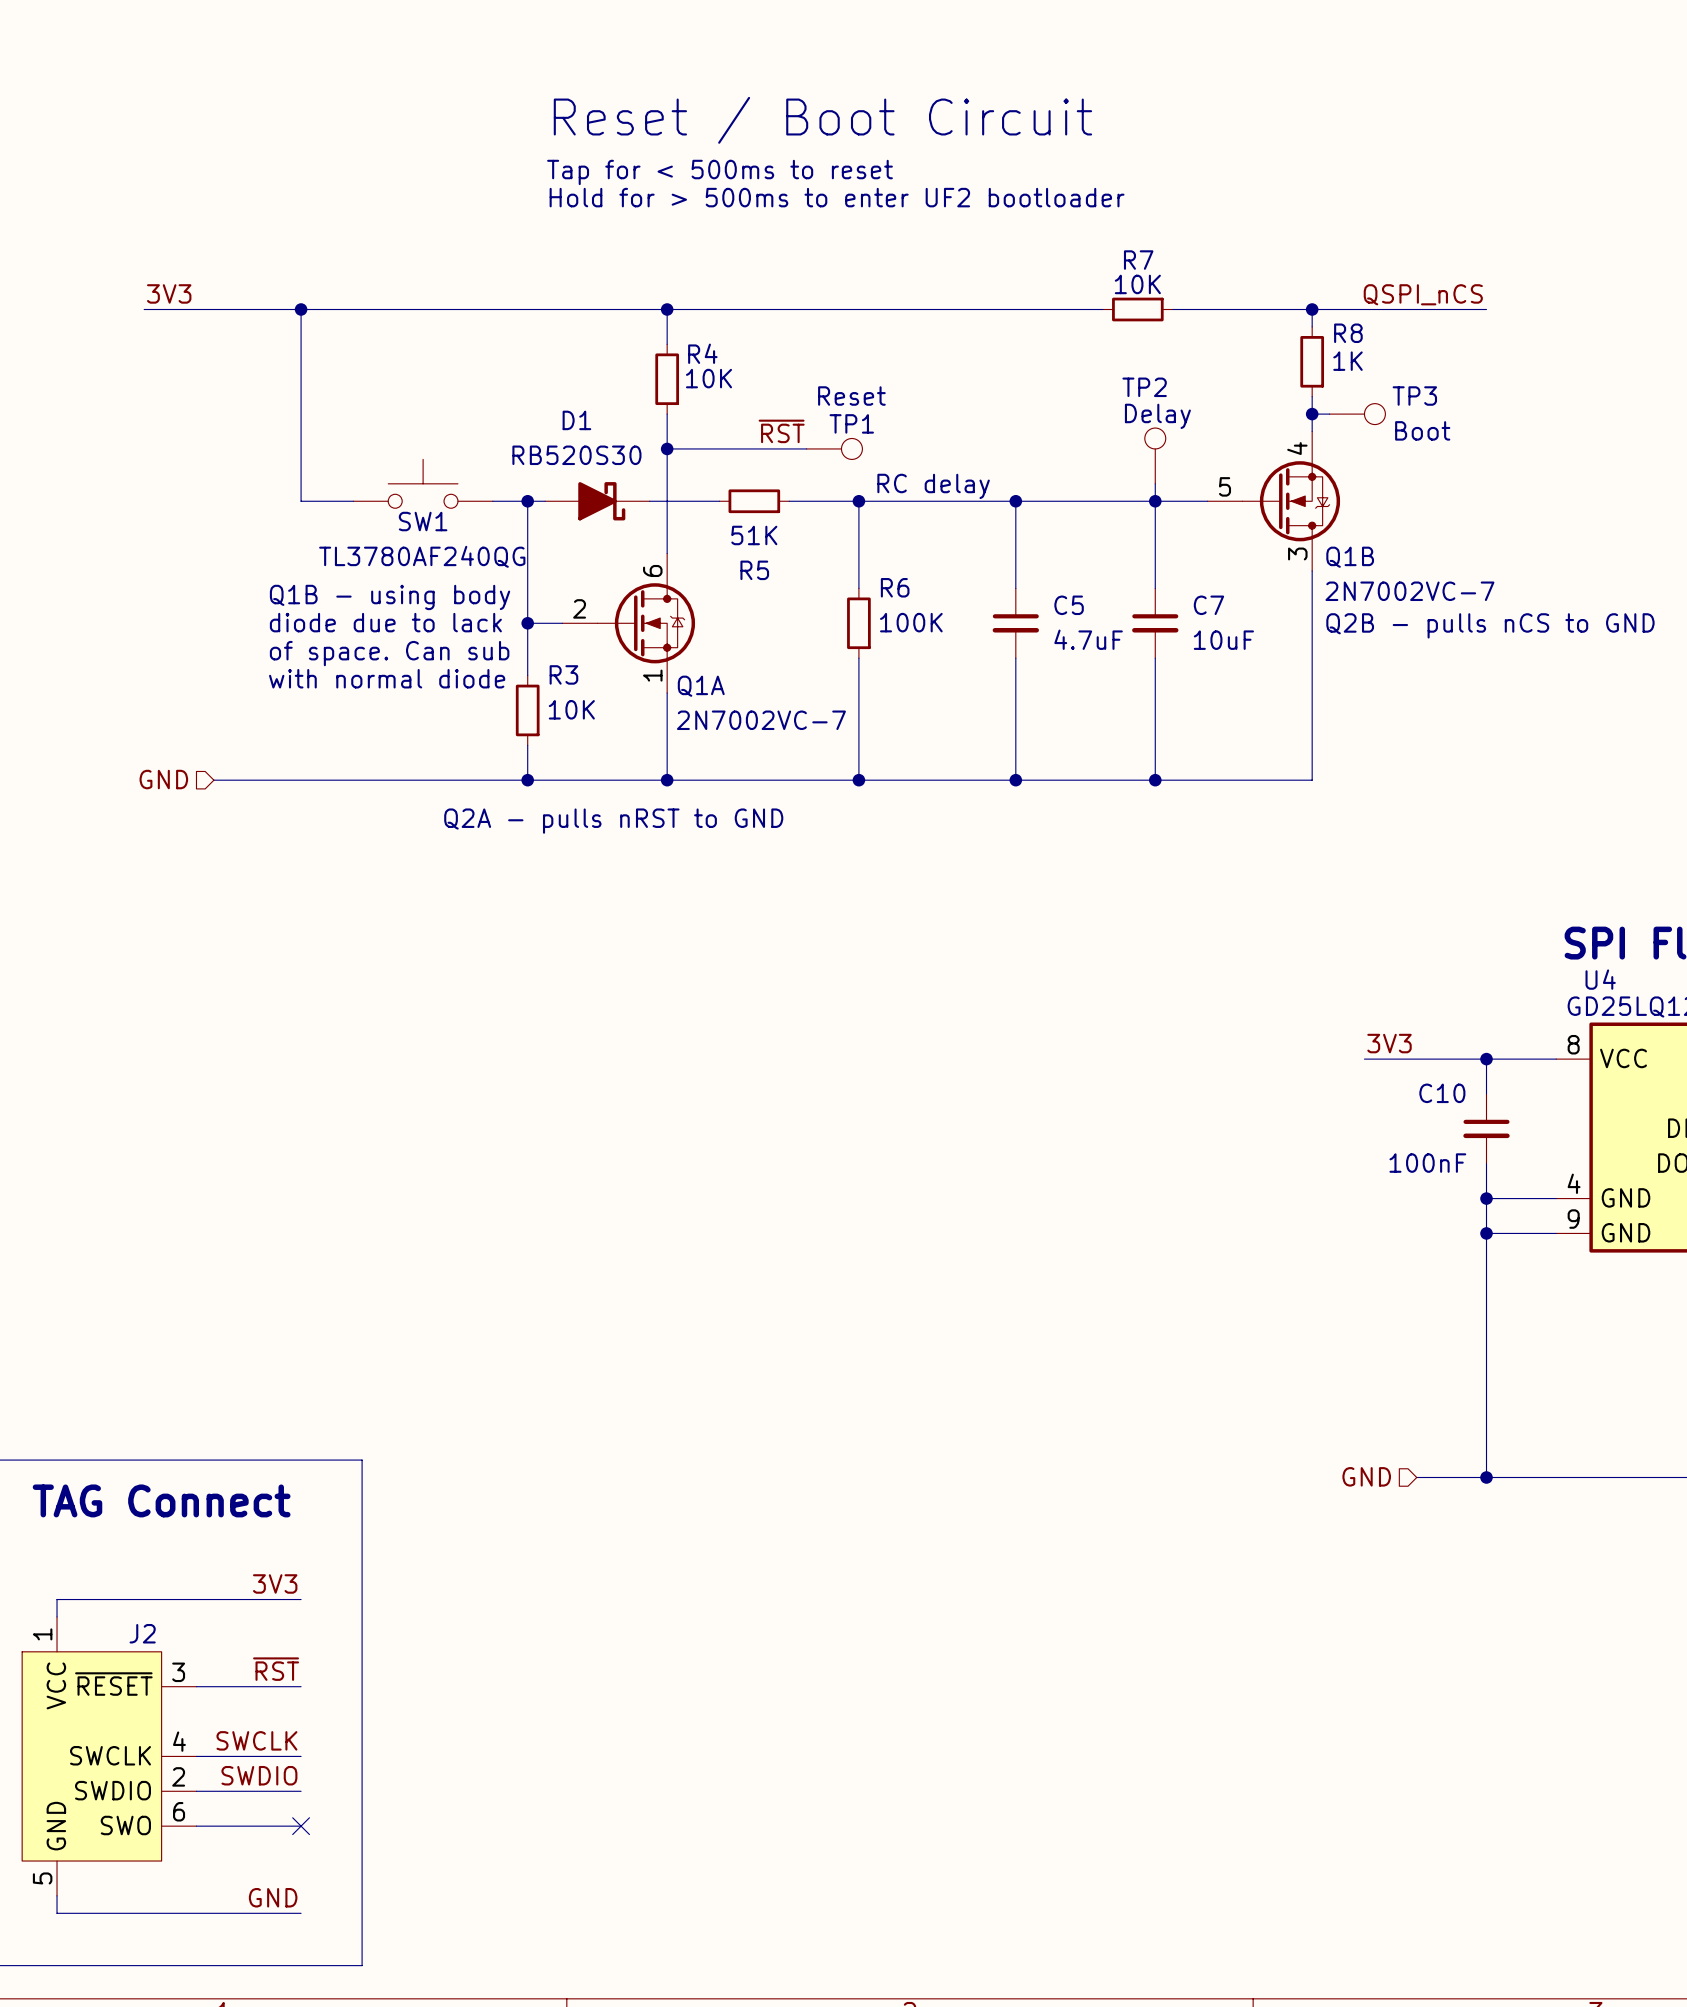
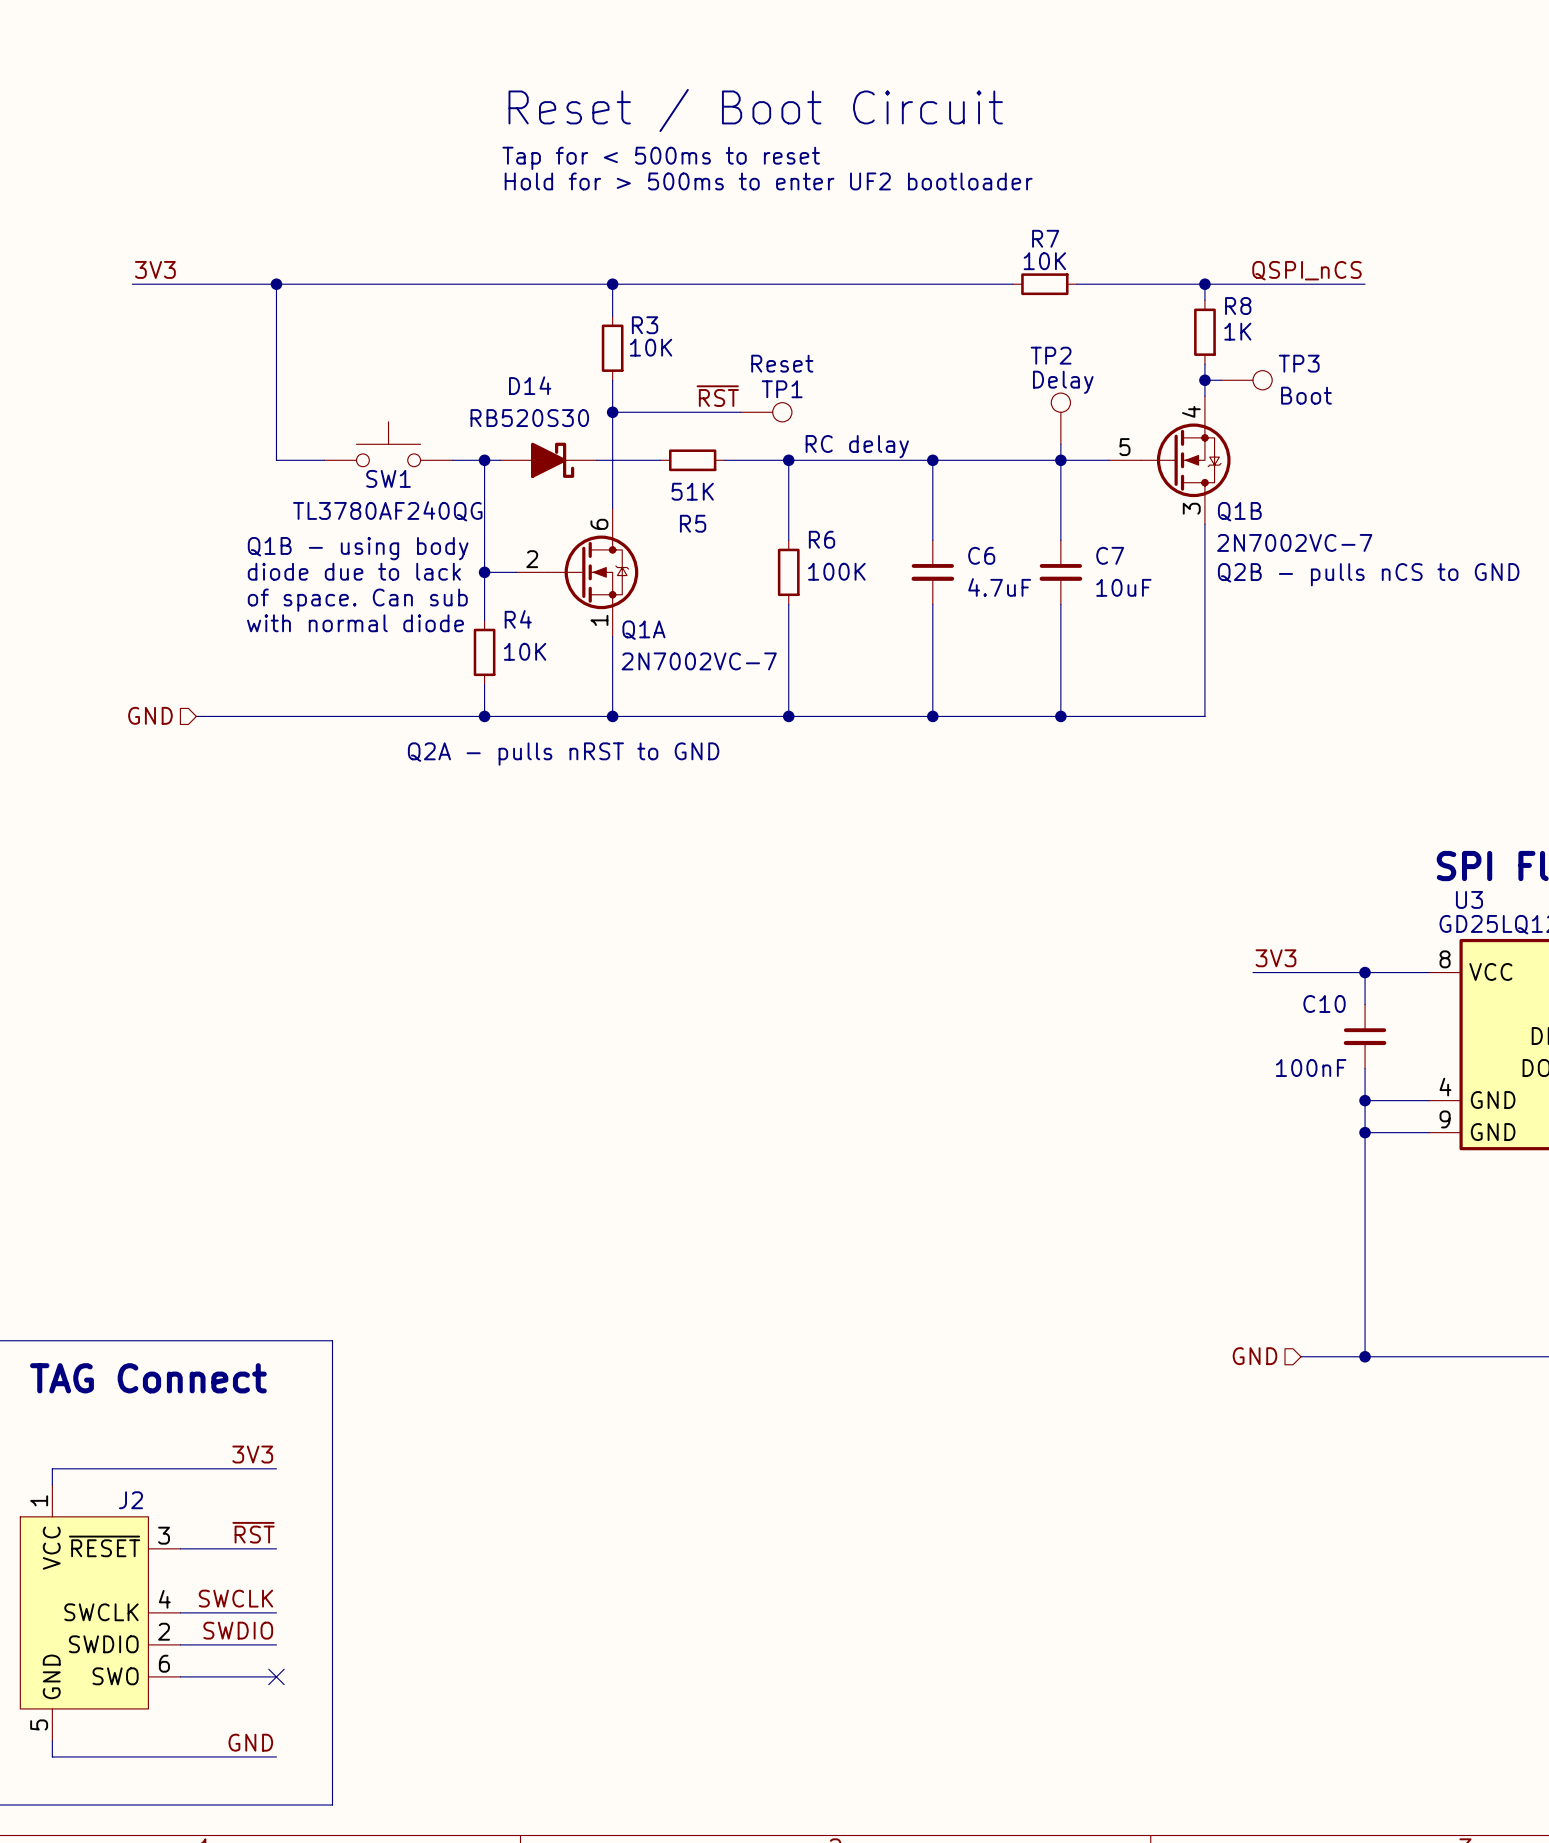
R4 name: R4 (702, 353) -> R3 (645, 325)
D1 name: D1 (576, 420) -> D14 (530, 385)
C5 name: C5 (1069, 605) -> C6 (981, 555)
R3 name: R3 (563, 674) -> R4 (518, 619)
U4 name: U4 (1600, 979) -> U3 (1469, 899)

